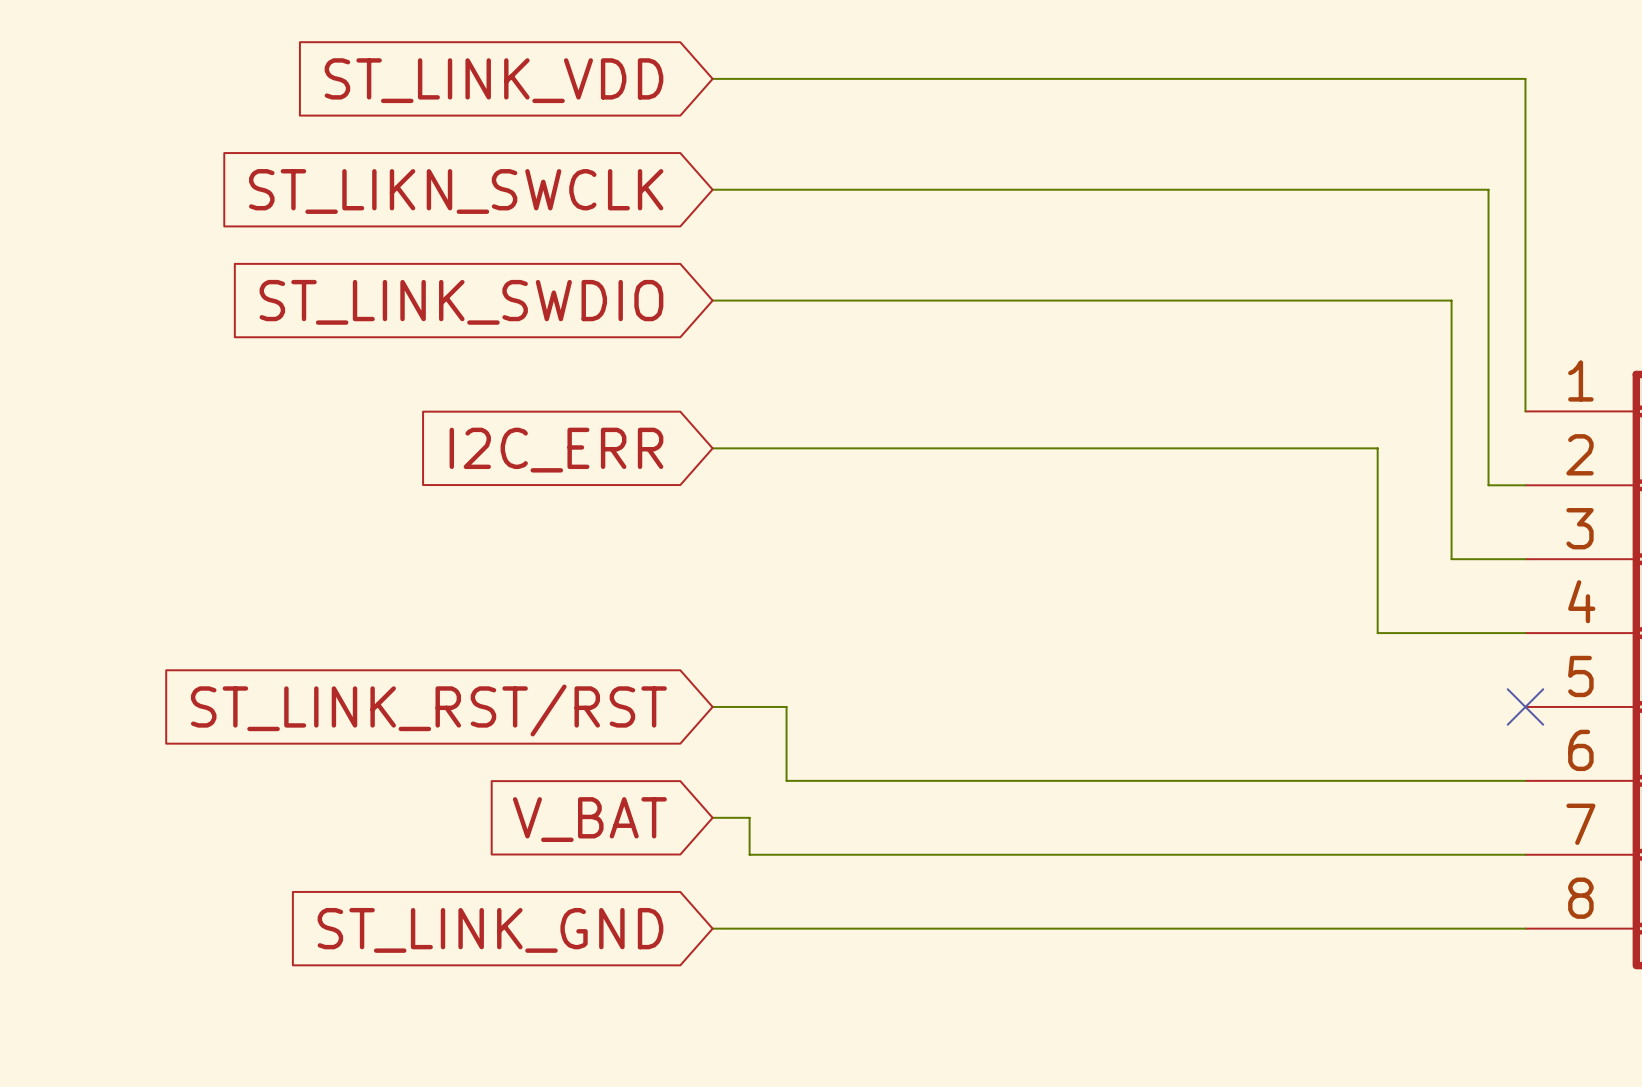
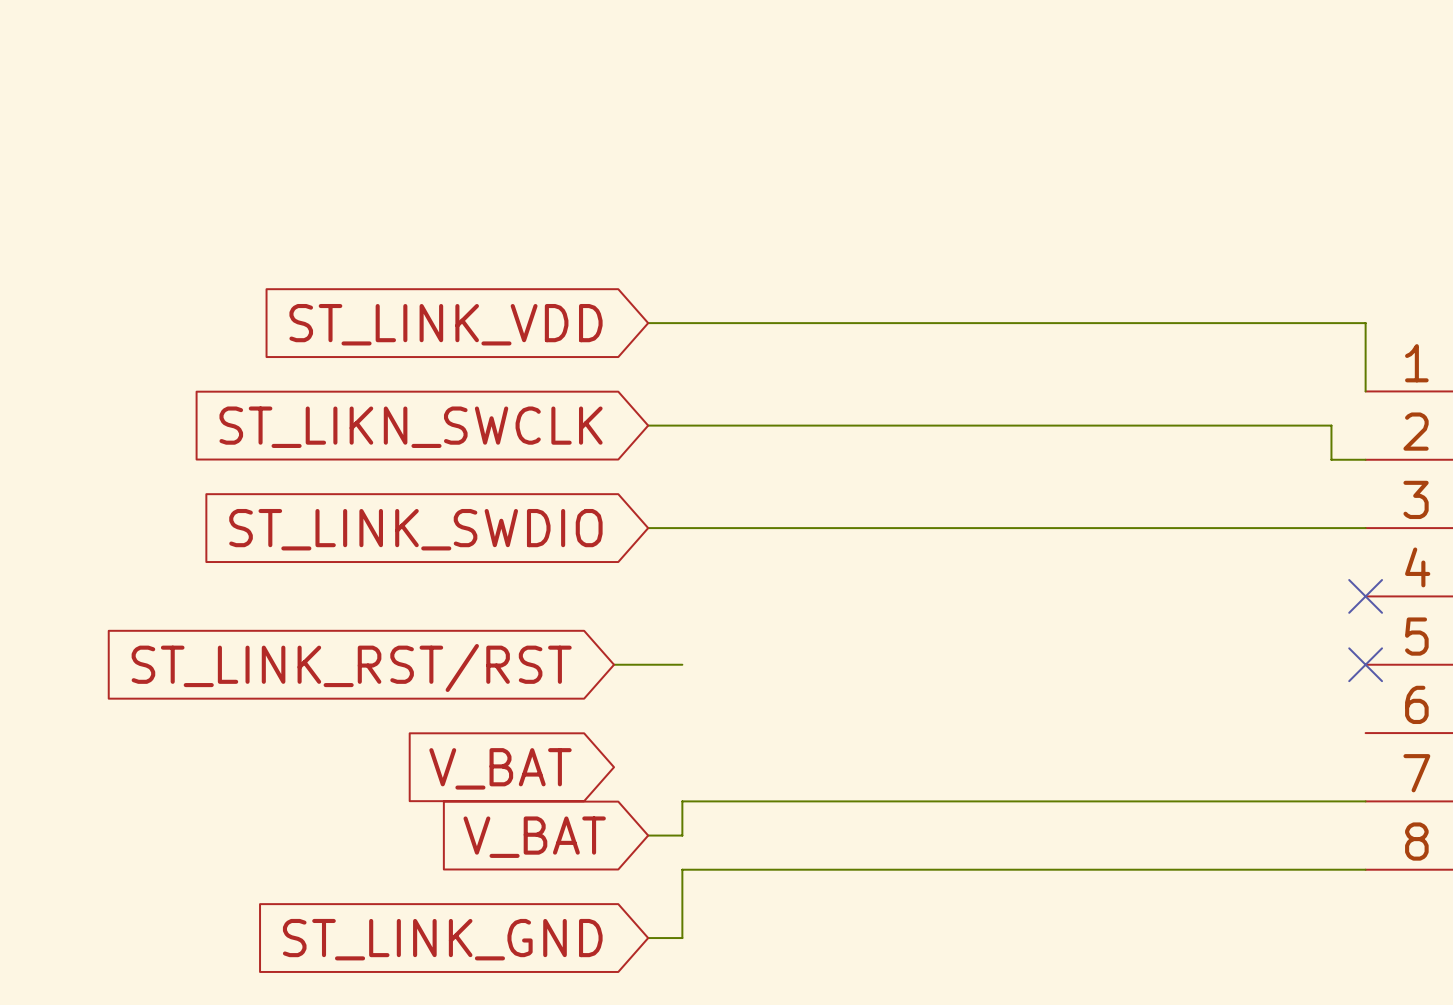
wire: (712, 78) (1525, 78) (1525, 337) -> (648, 323) (1365, 323)
global label position: ST_LINK_VDD (494, 80) -> ST_LINK_VDD (446, 324)
wire: (712, 189) (1488, 189) (1488, 448) -> none
global label position: ST_LIKN_SWCLK (456, 191) -> ST_LIKN_SWCLK (411, 427)
wire: (712, 300) (1451, 300) (1451, 559) -> (648, 528) (1297, 528)
global label position: ST_LINK_SWDIO (461, 302) -> ST_LINK_SWDIO (415, 529)
wire: (712, 448) (749, 448) -> none
wire: (1377, 448) (1377, 633) (1525, 633) -> (1228, 425) (1331, 425)
global label: I2C_ERR (556, 450) -> none
no-connect mark: none -> (1365, 596)
wire: (786, 706) (786, 780) (1525, 780) -> none
wire: (712, 817) (749, 817) (749, 854) (786, 854) -> (648, 835) (682, 835) (682, 801)
global label: none -> V_BAT (534, 837)
wire: (712, 928) (786, 928) -> (648, 938) (682, 938) (682, 869)
global label position: ST_LINK_GND (490, 930) -> ST_LINK_GND (442, 939)

